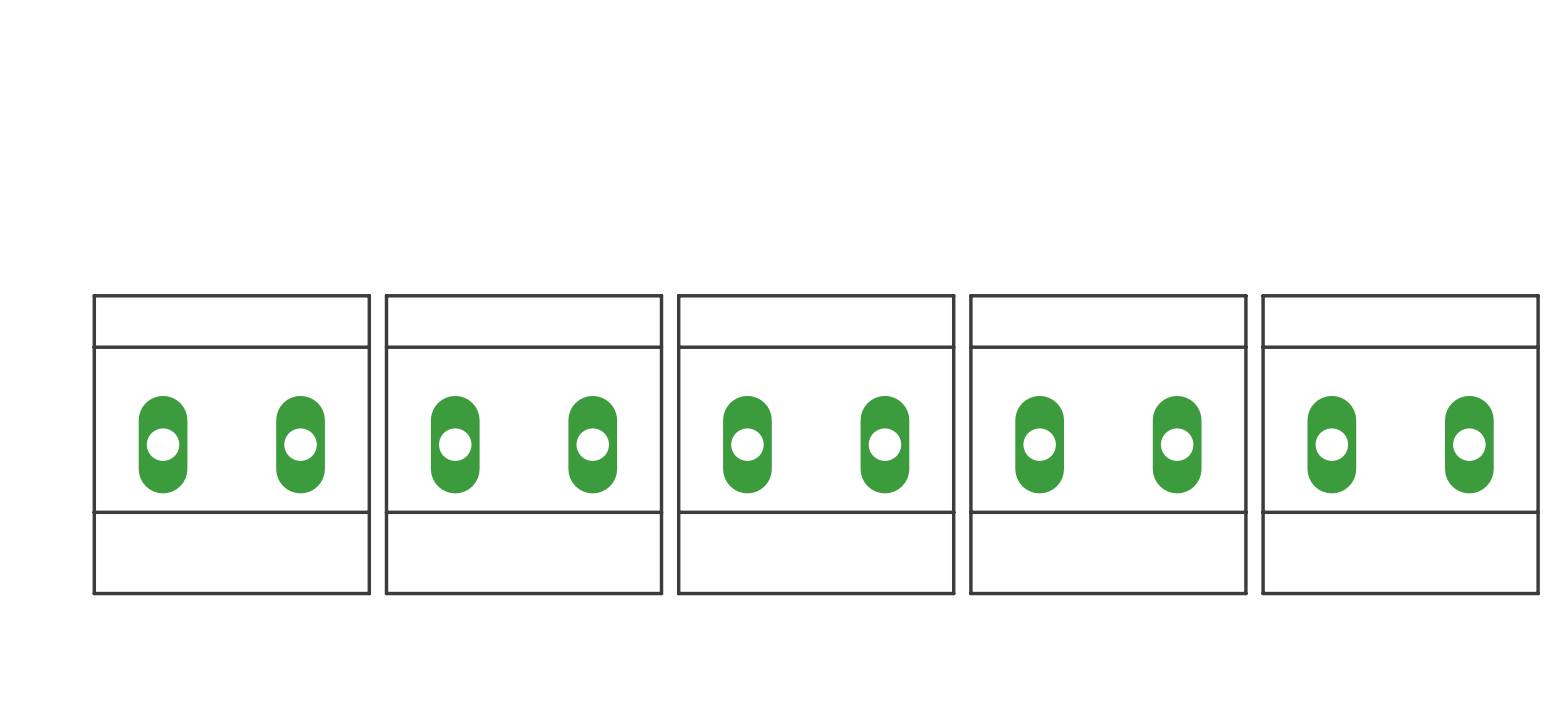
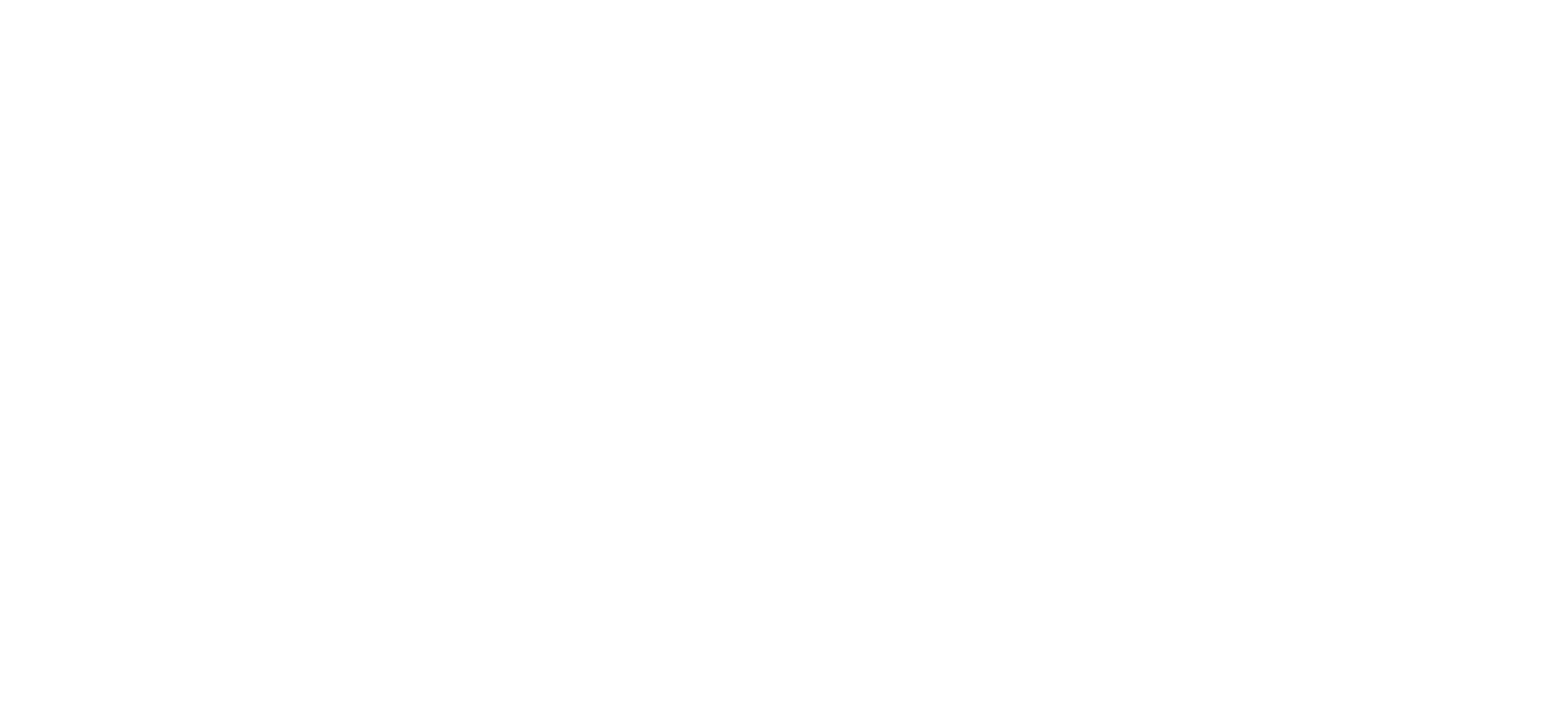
part: (231, 444) -> none
part: (524, 444) -> none
part: (816, 444) -> none
part: (1108, 444) -> none
part: (1400, 444) -> none

